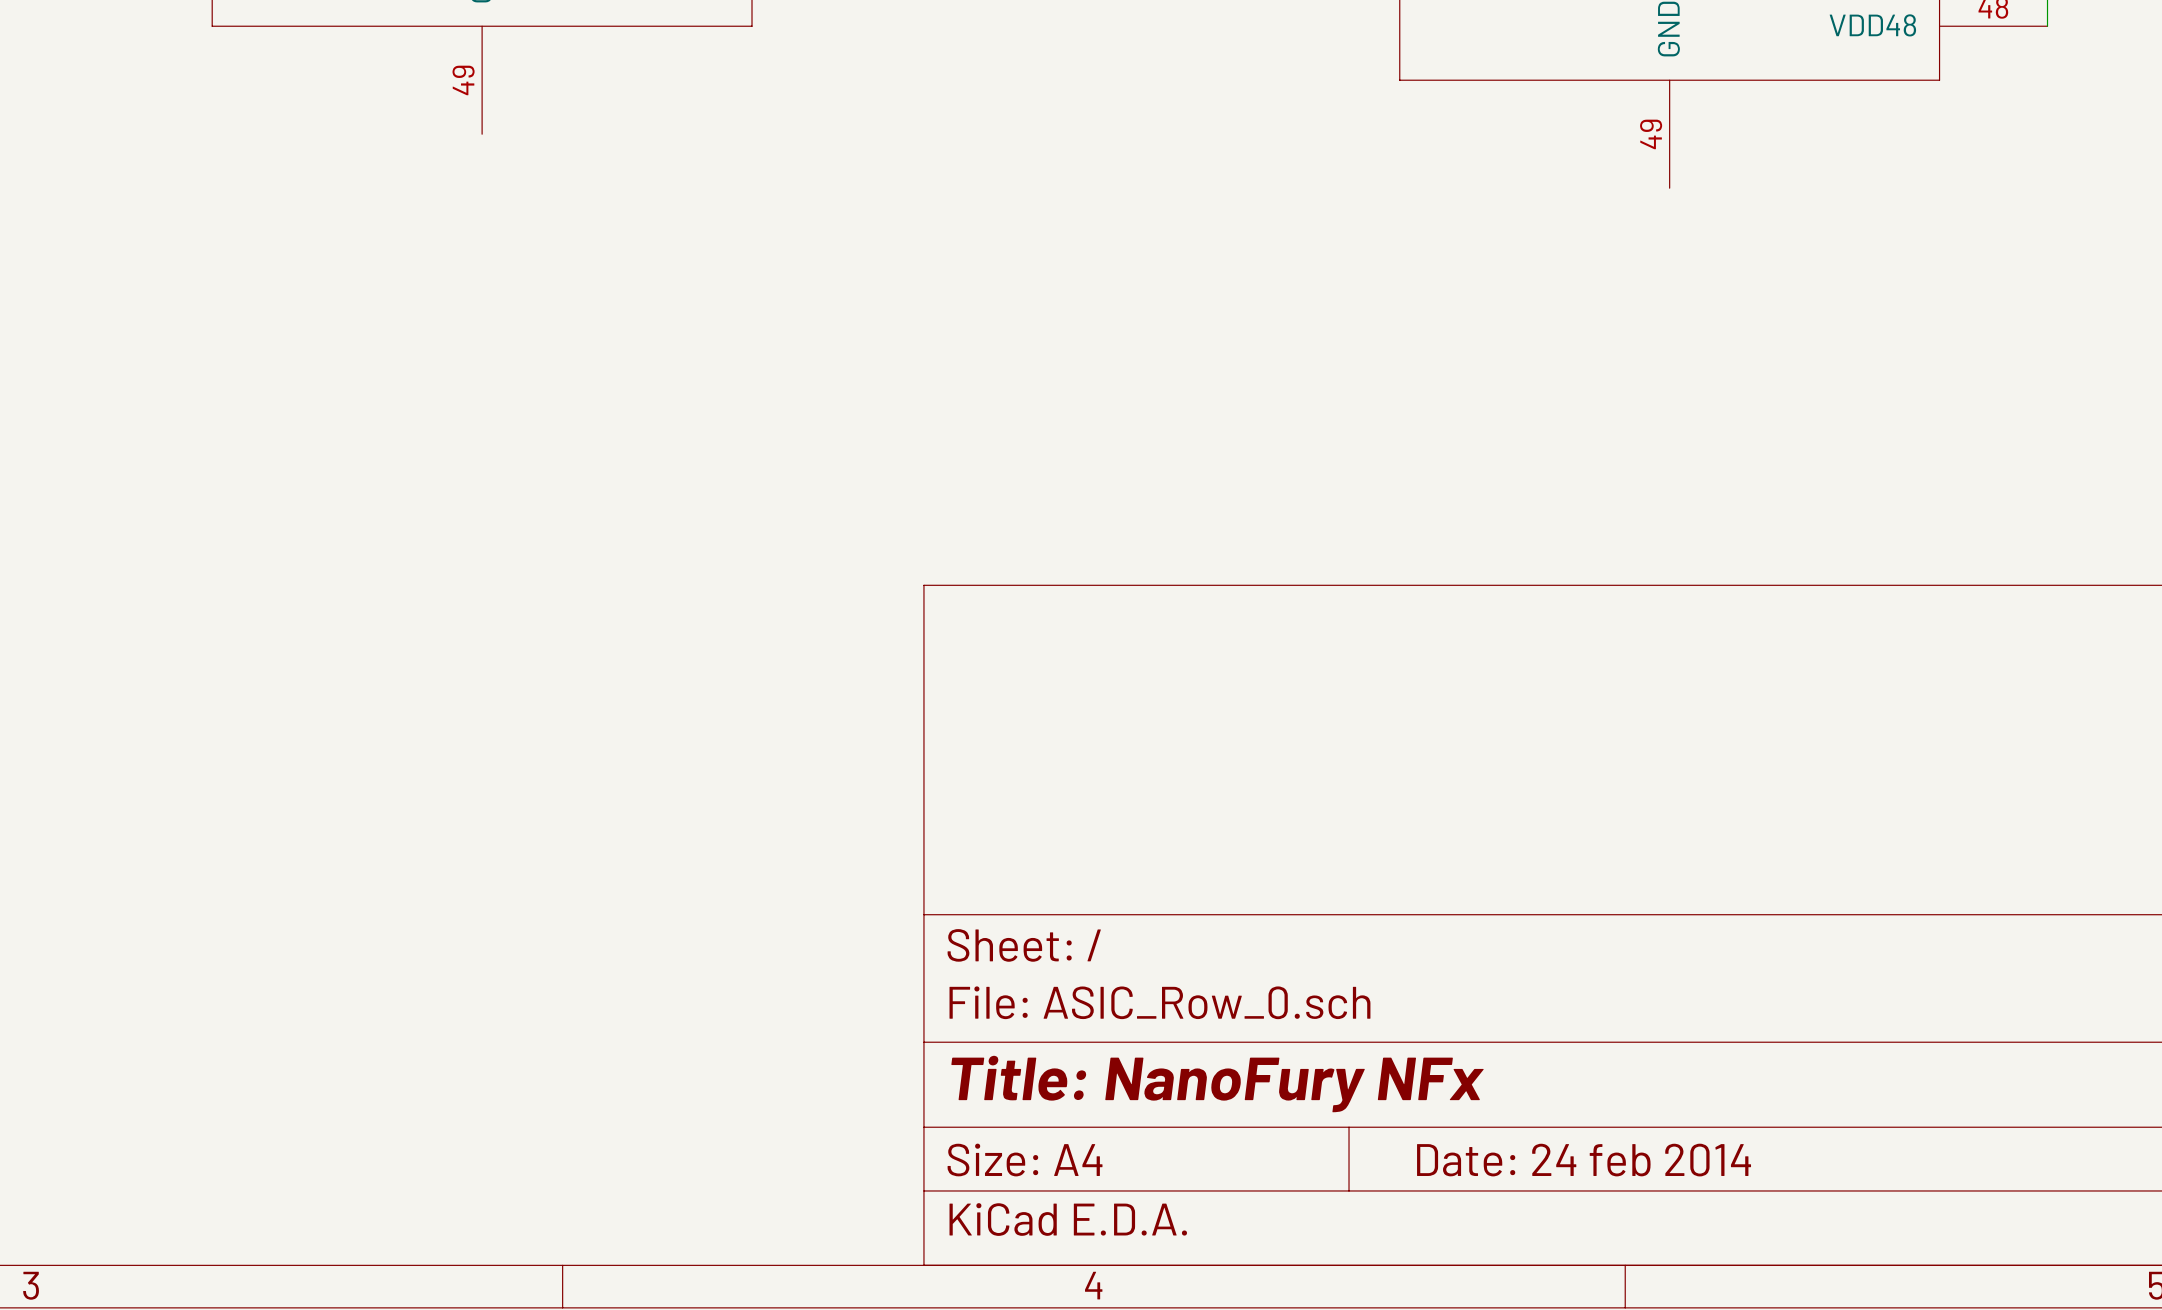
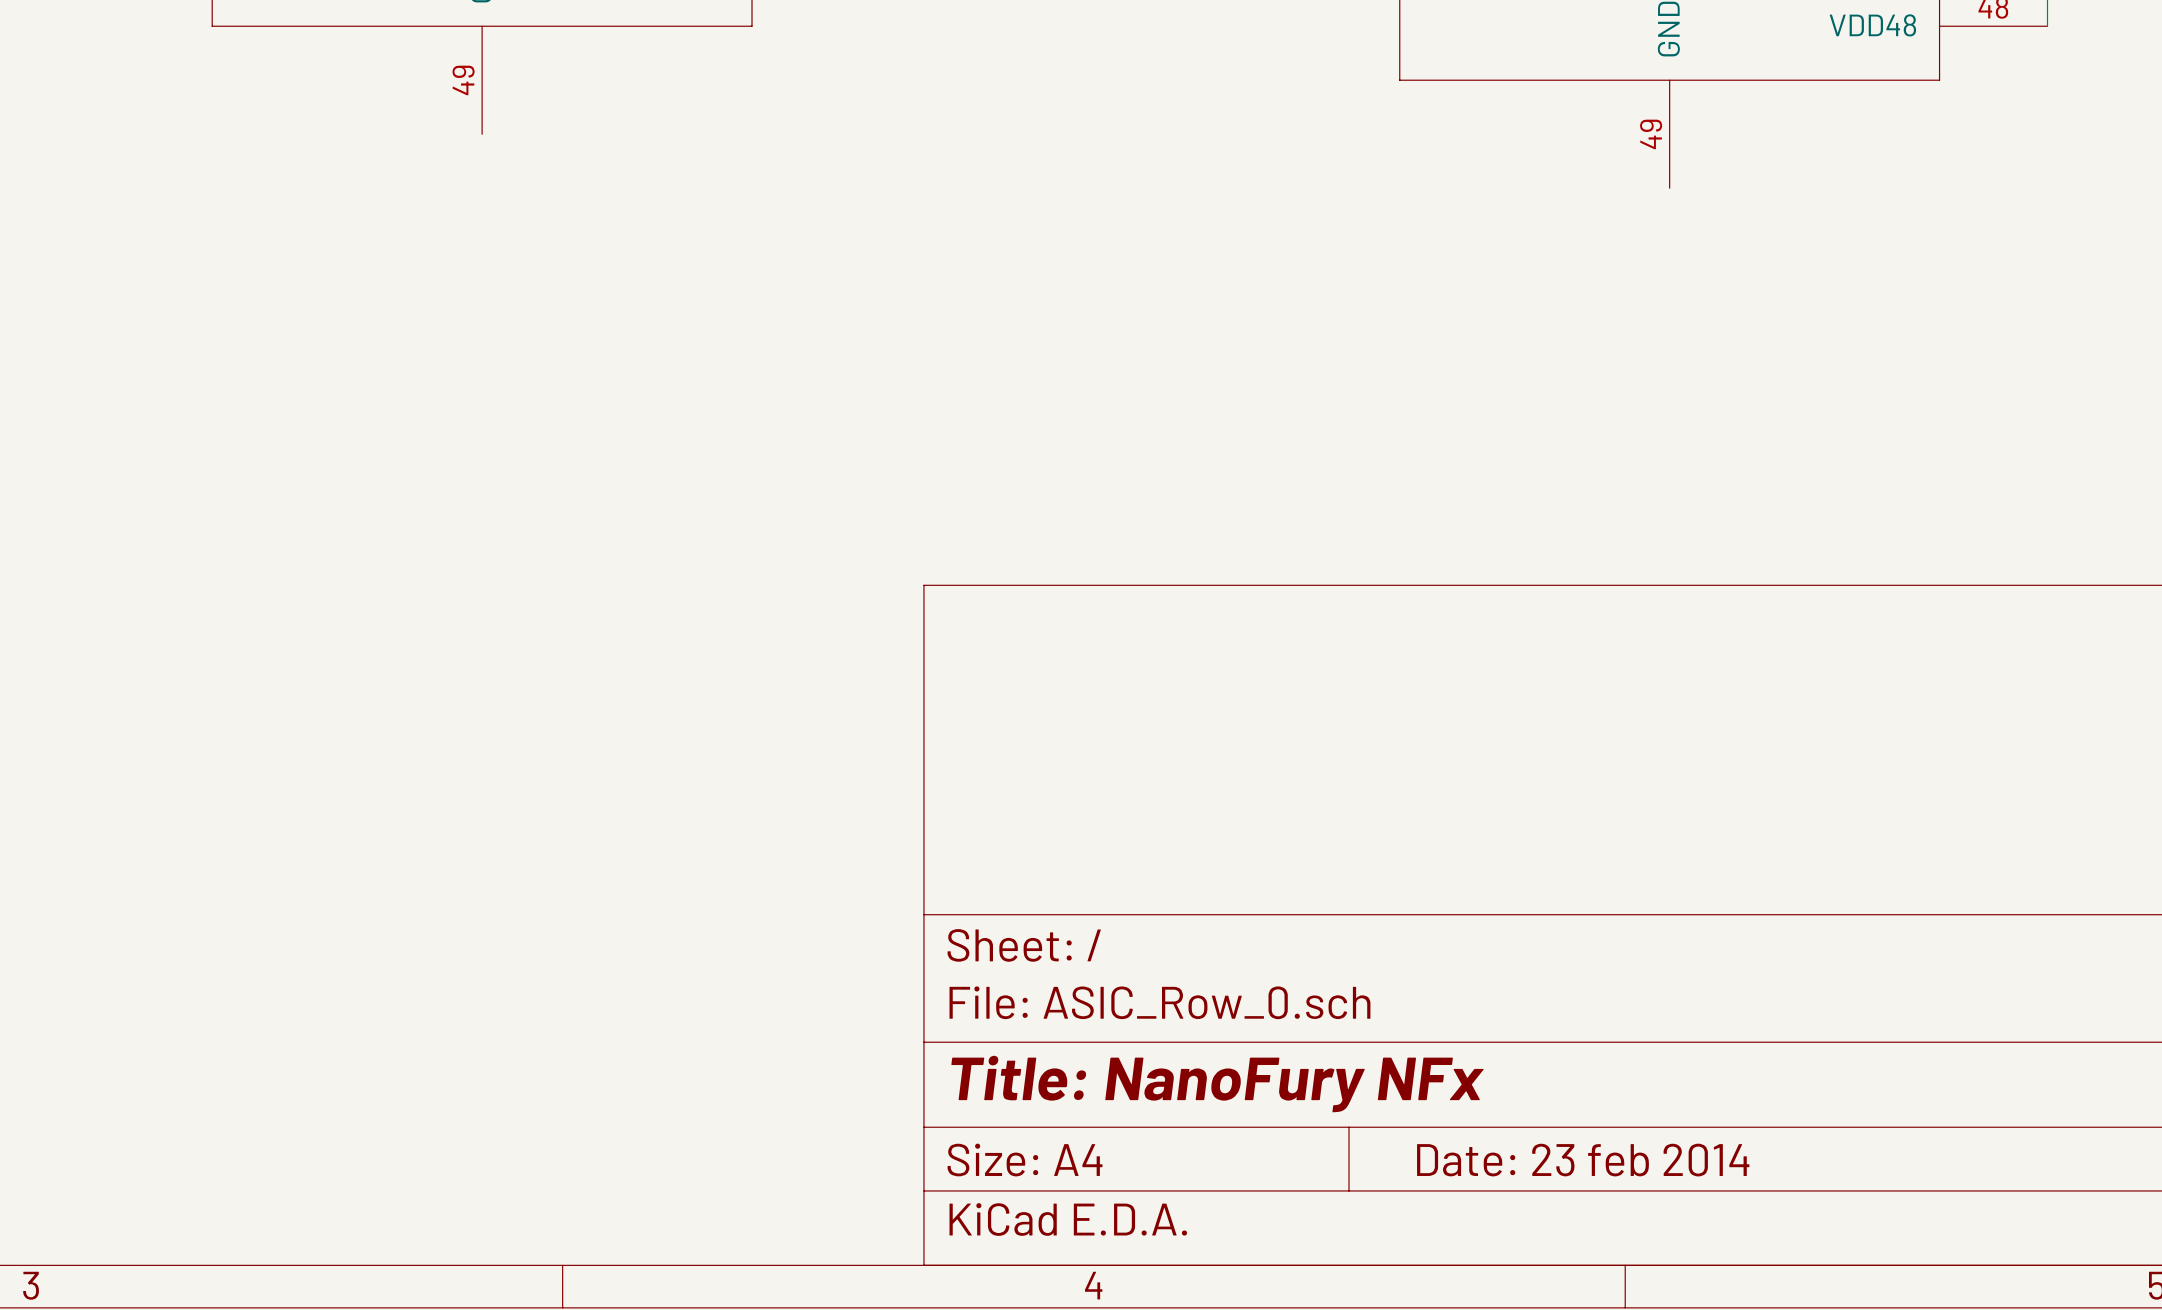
title block: Date: 24 feb 2014 (1584, 1160) -> Date: 23 feb 2014 (1583, 1160)

